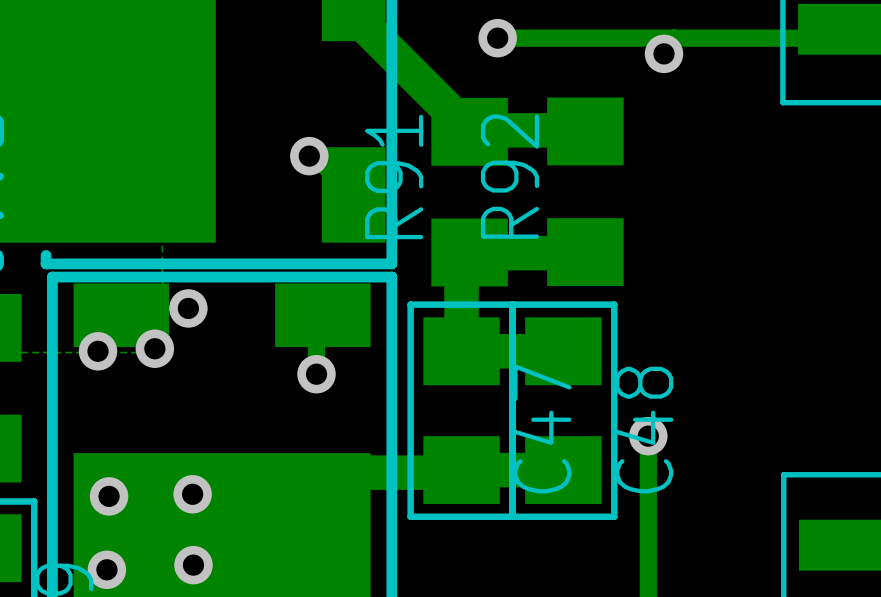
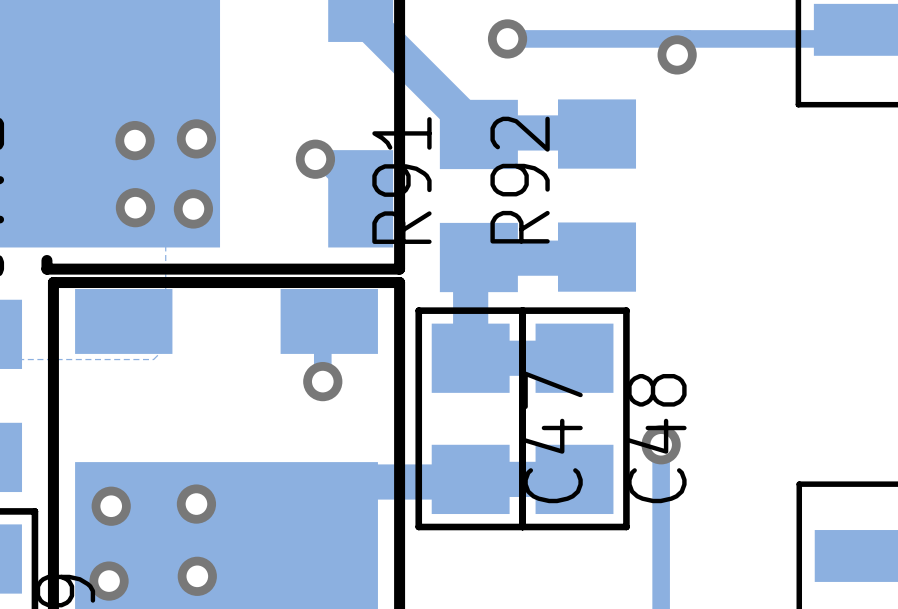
via: none -> (196, 138)
via: none -> (135, 140)
via: none -> (135, 207)
via: none -> (193, 208)
via: (188, 308) -> none
via: (154, 348) -> none
via: (98, 351) -> none

